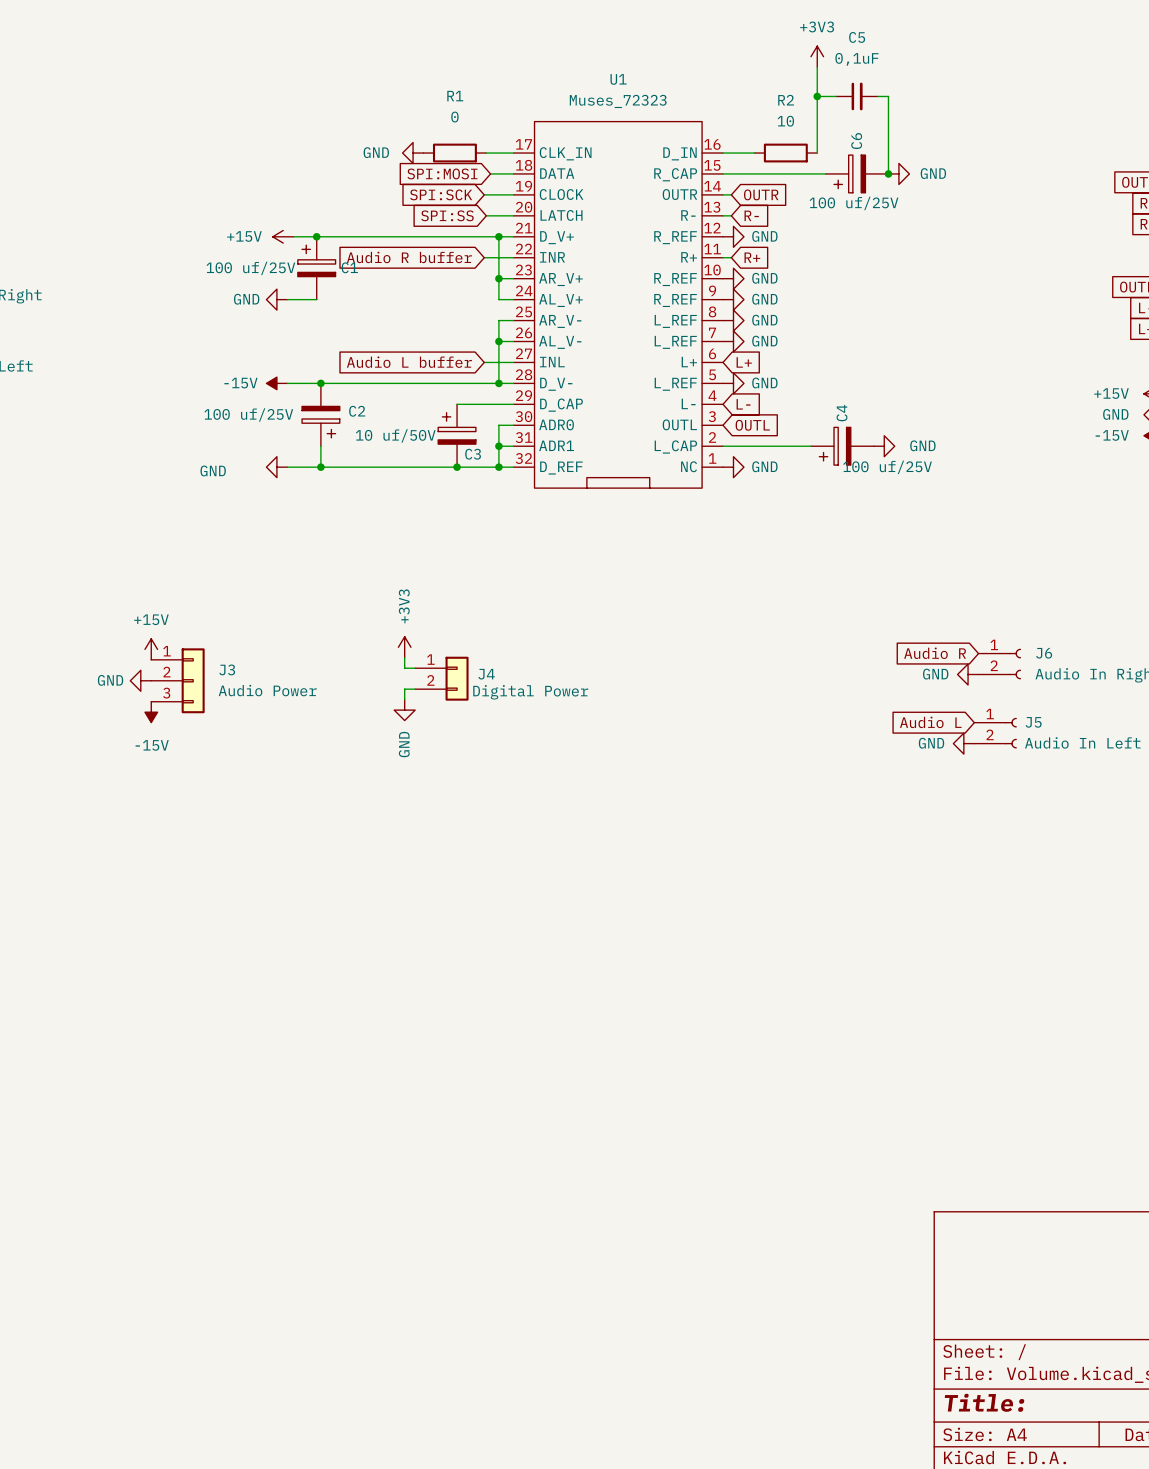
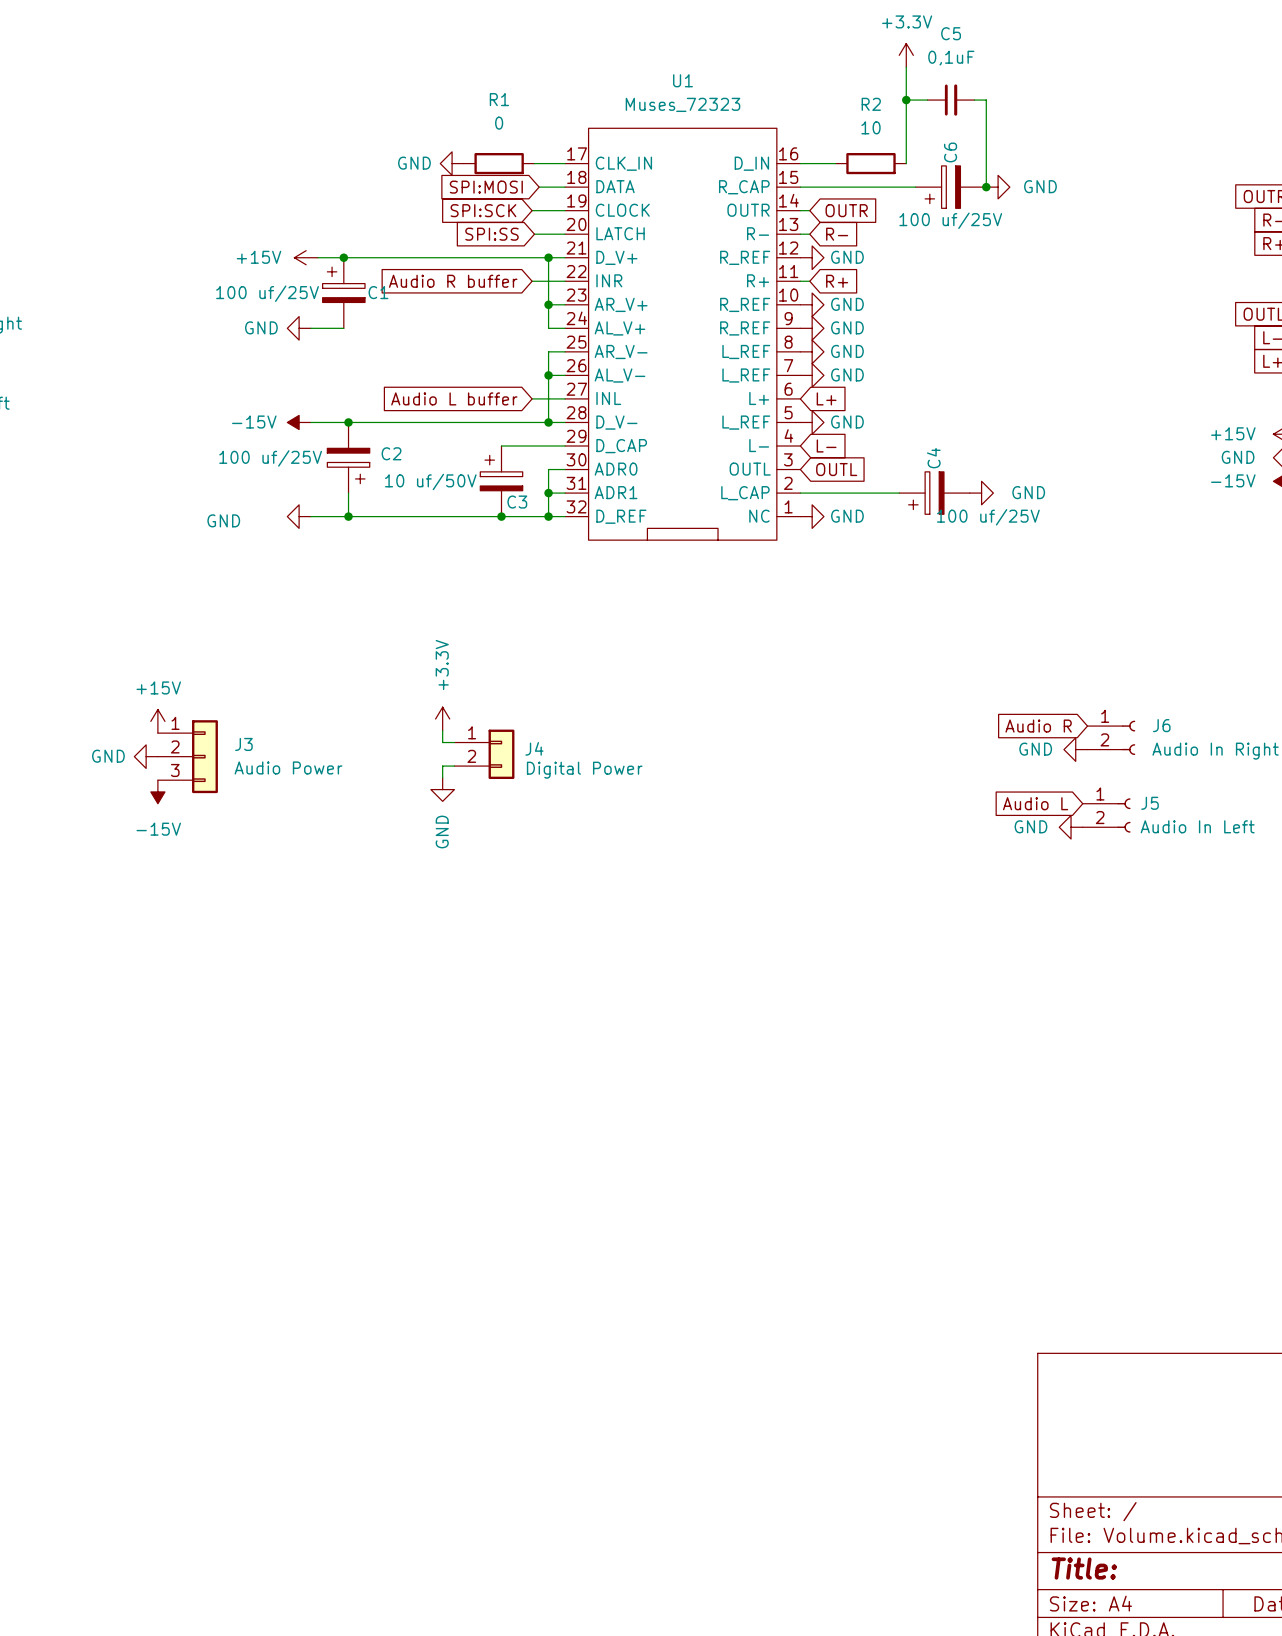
power symbol: +3V3 (817, 56) -> +3.3V (906, 55)
power symbol: +3V3 (404, 647) -> +3.3V (442, 719)

